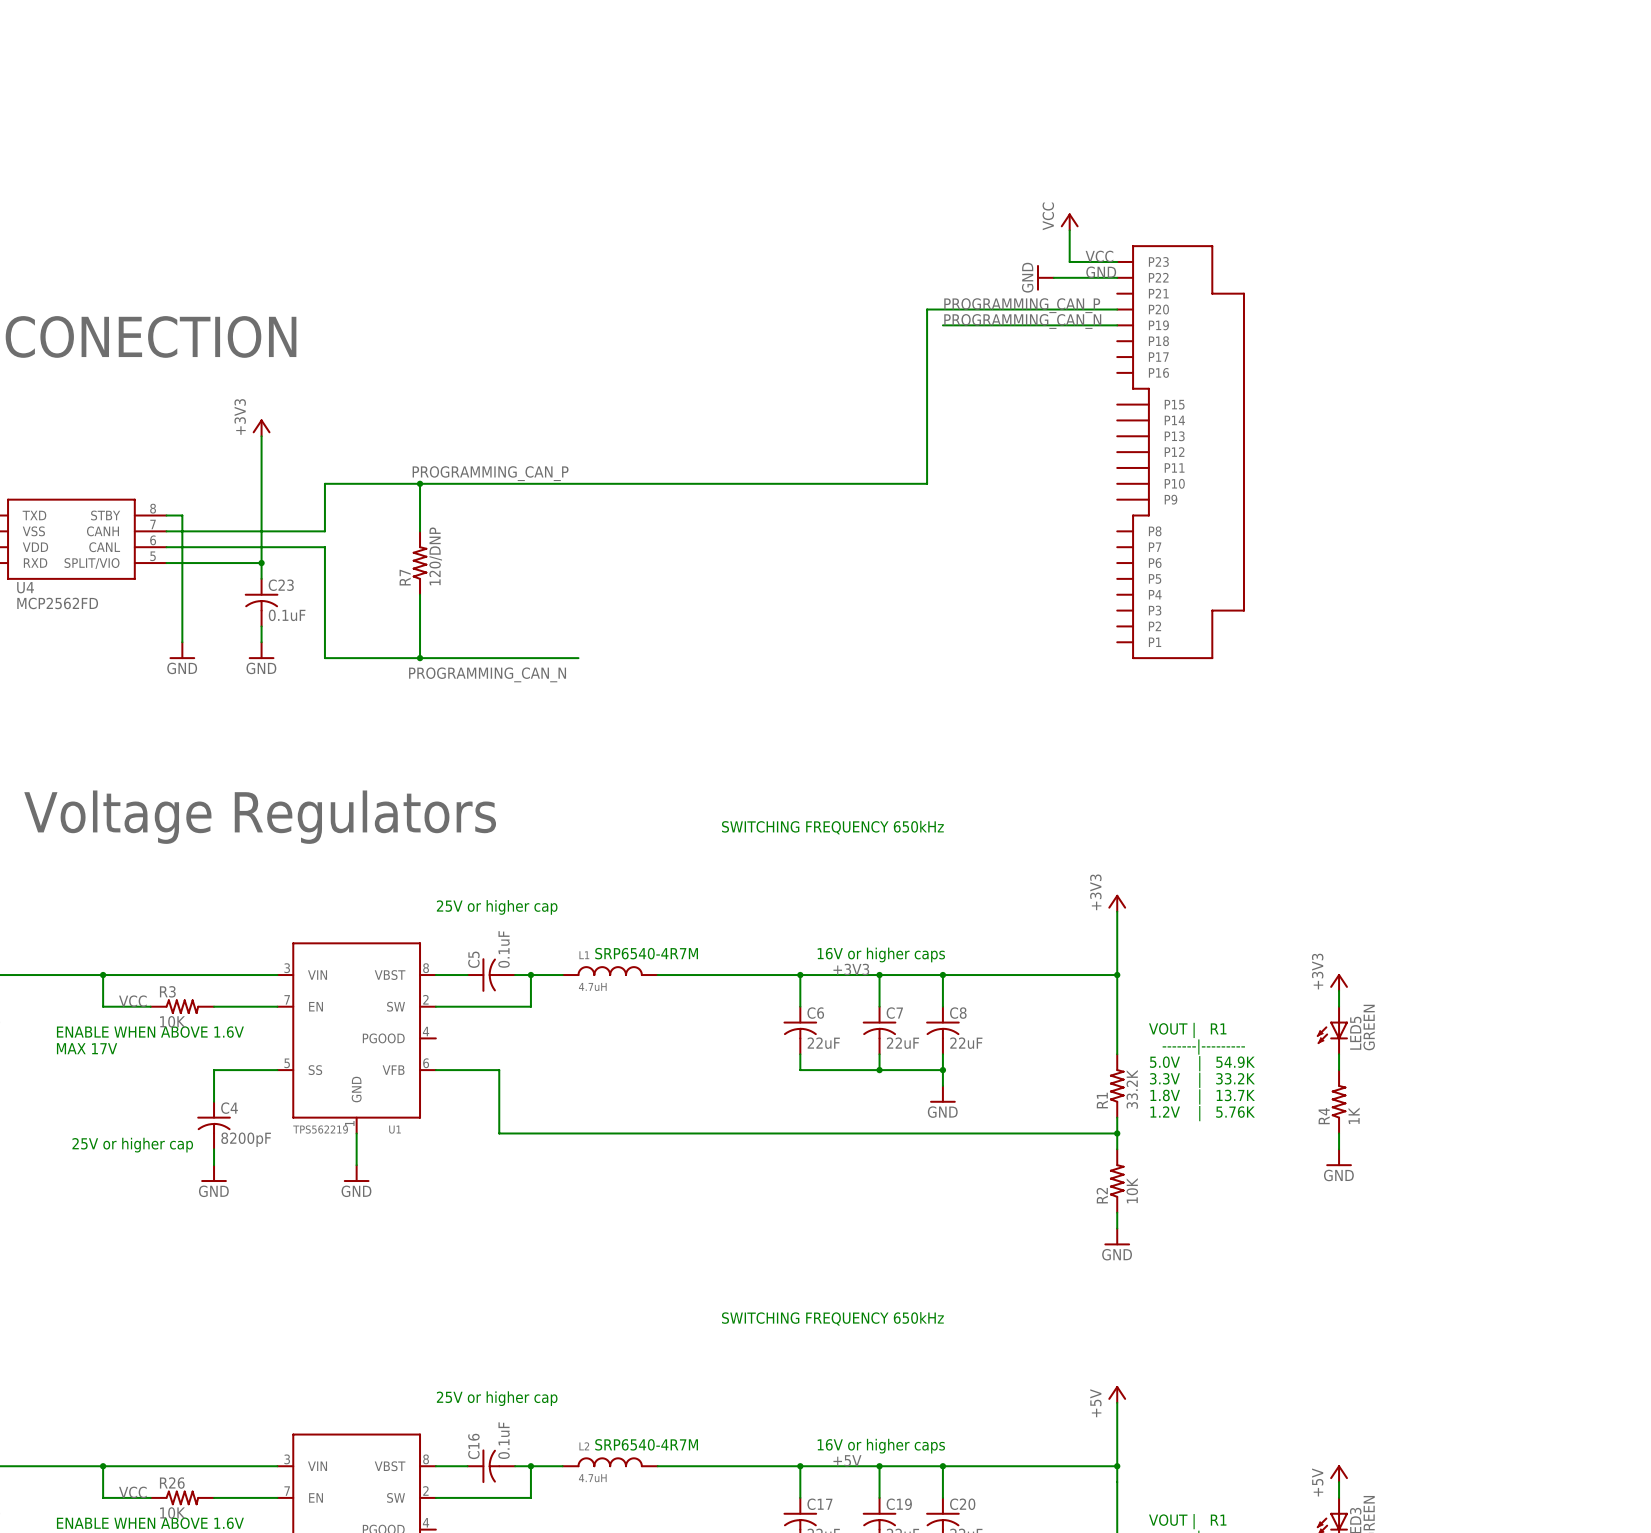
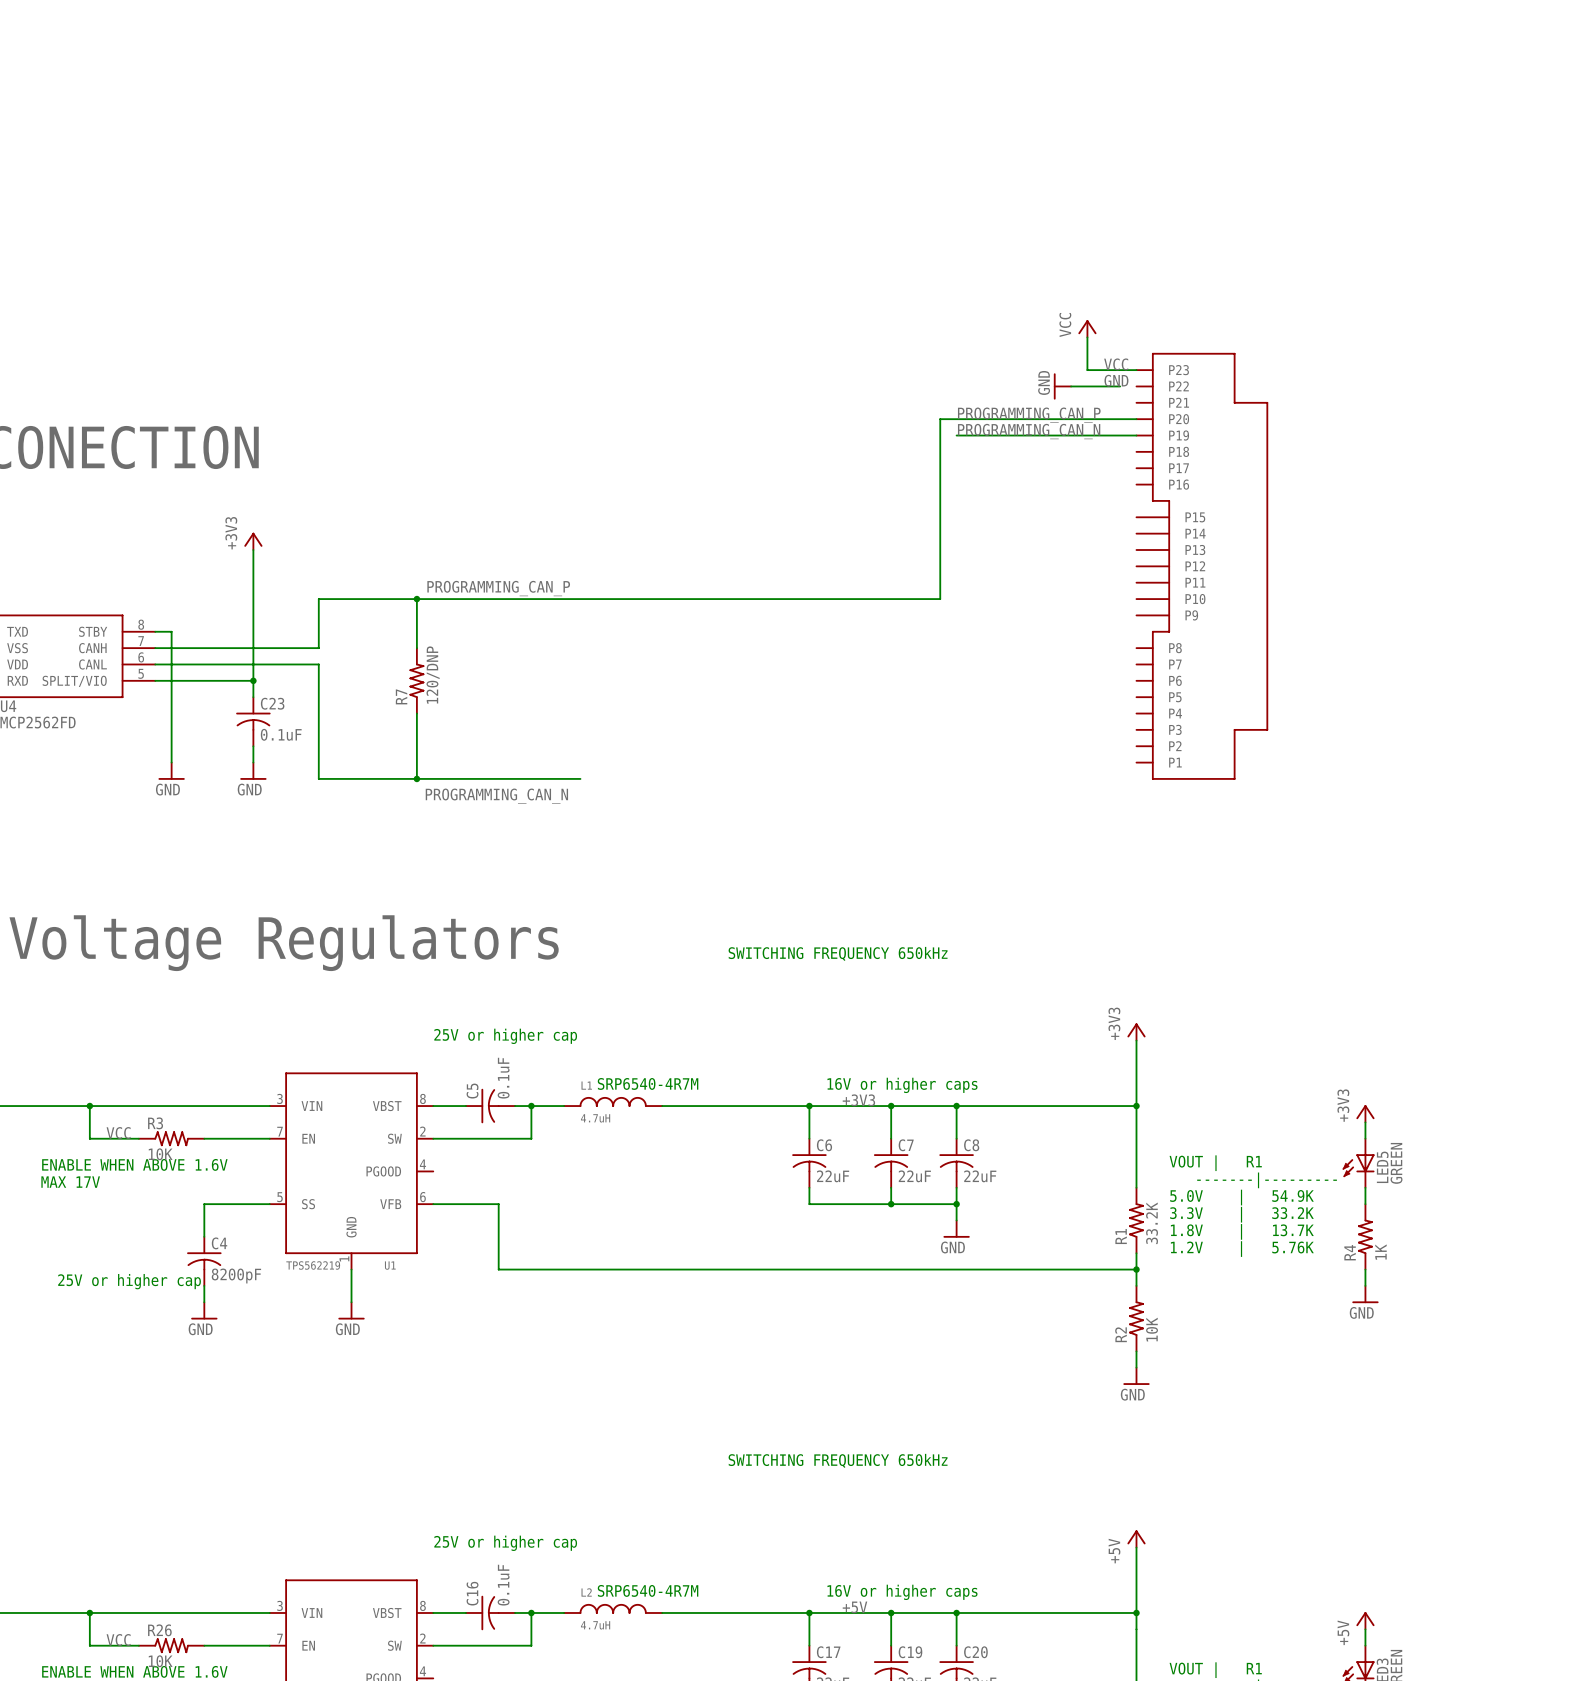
wire: (1101, 277) (1117, 277) -> none

